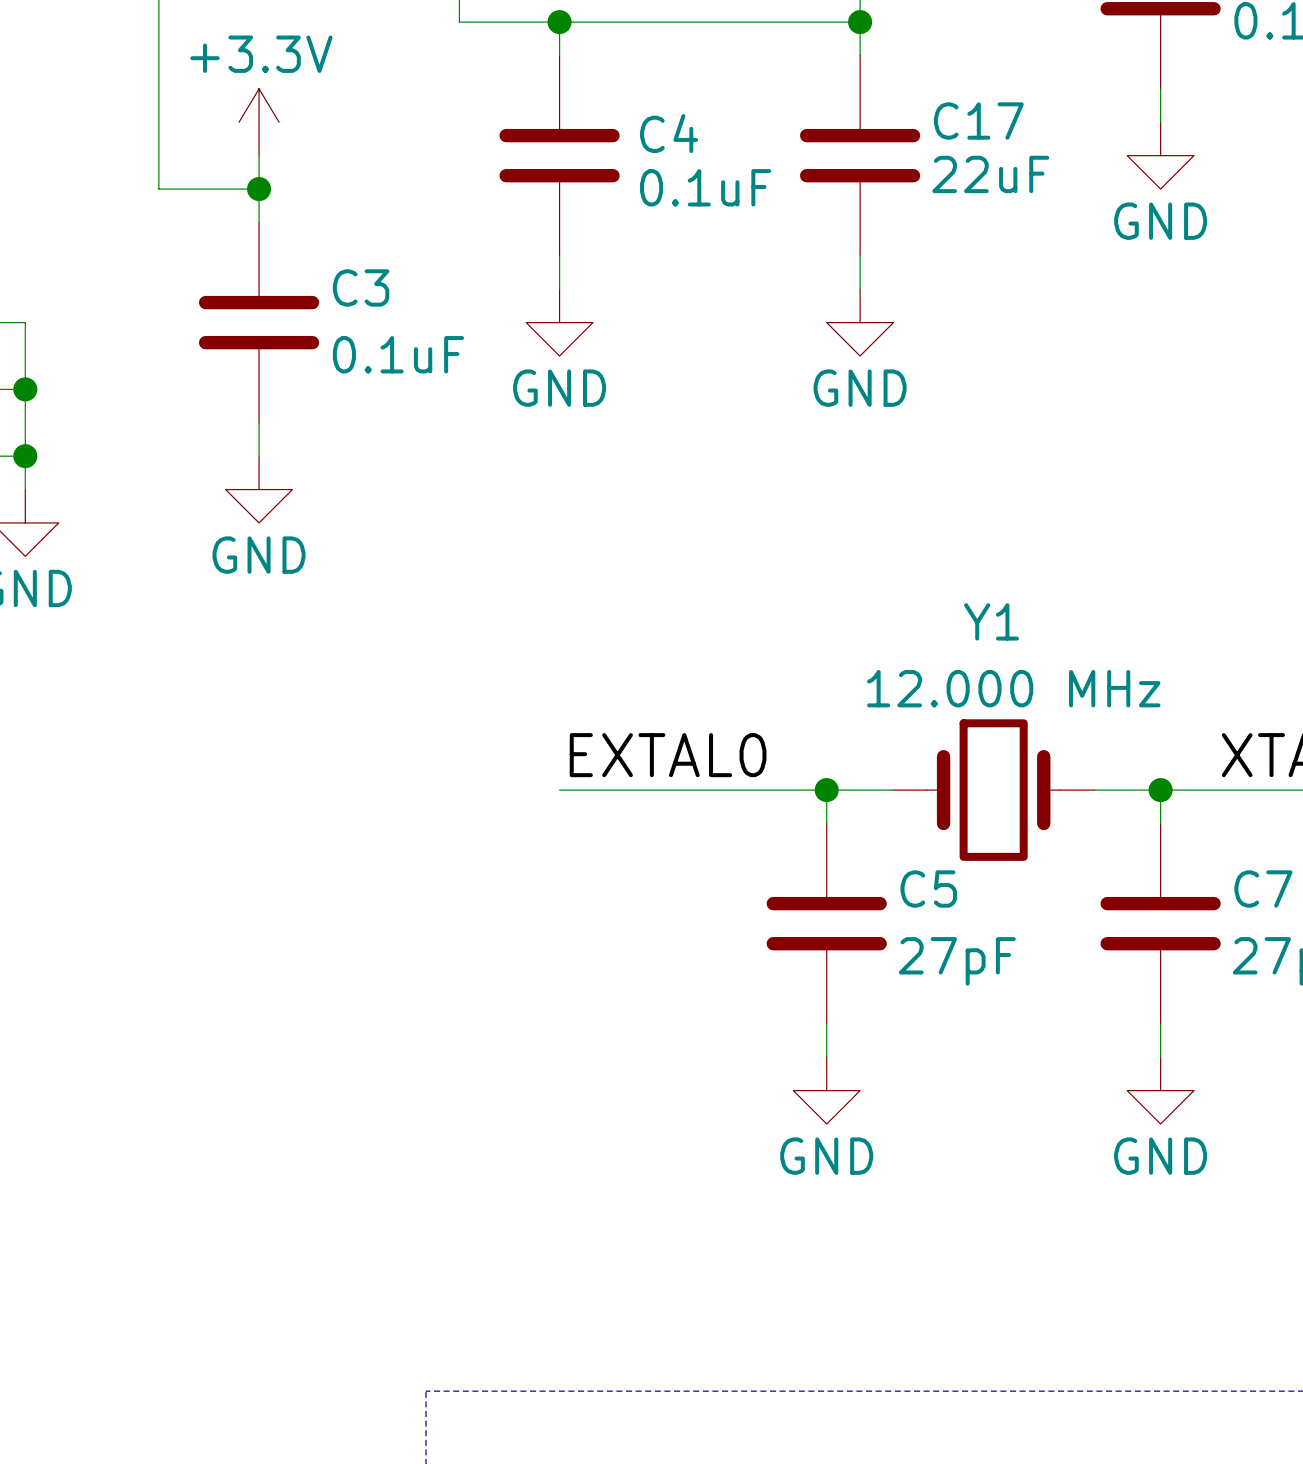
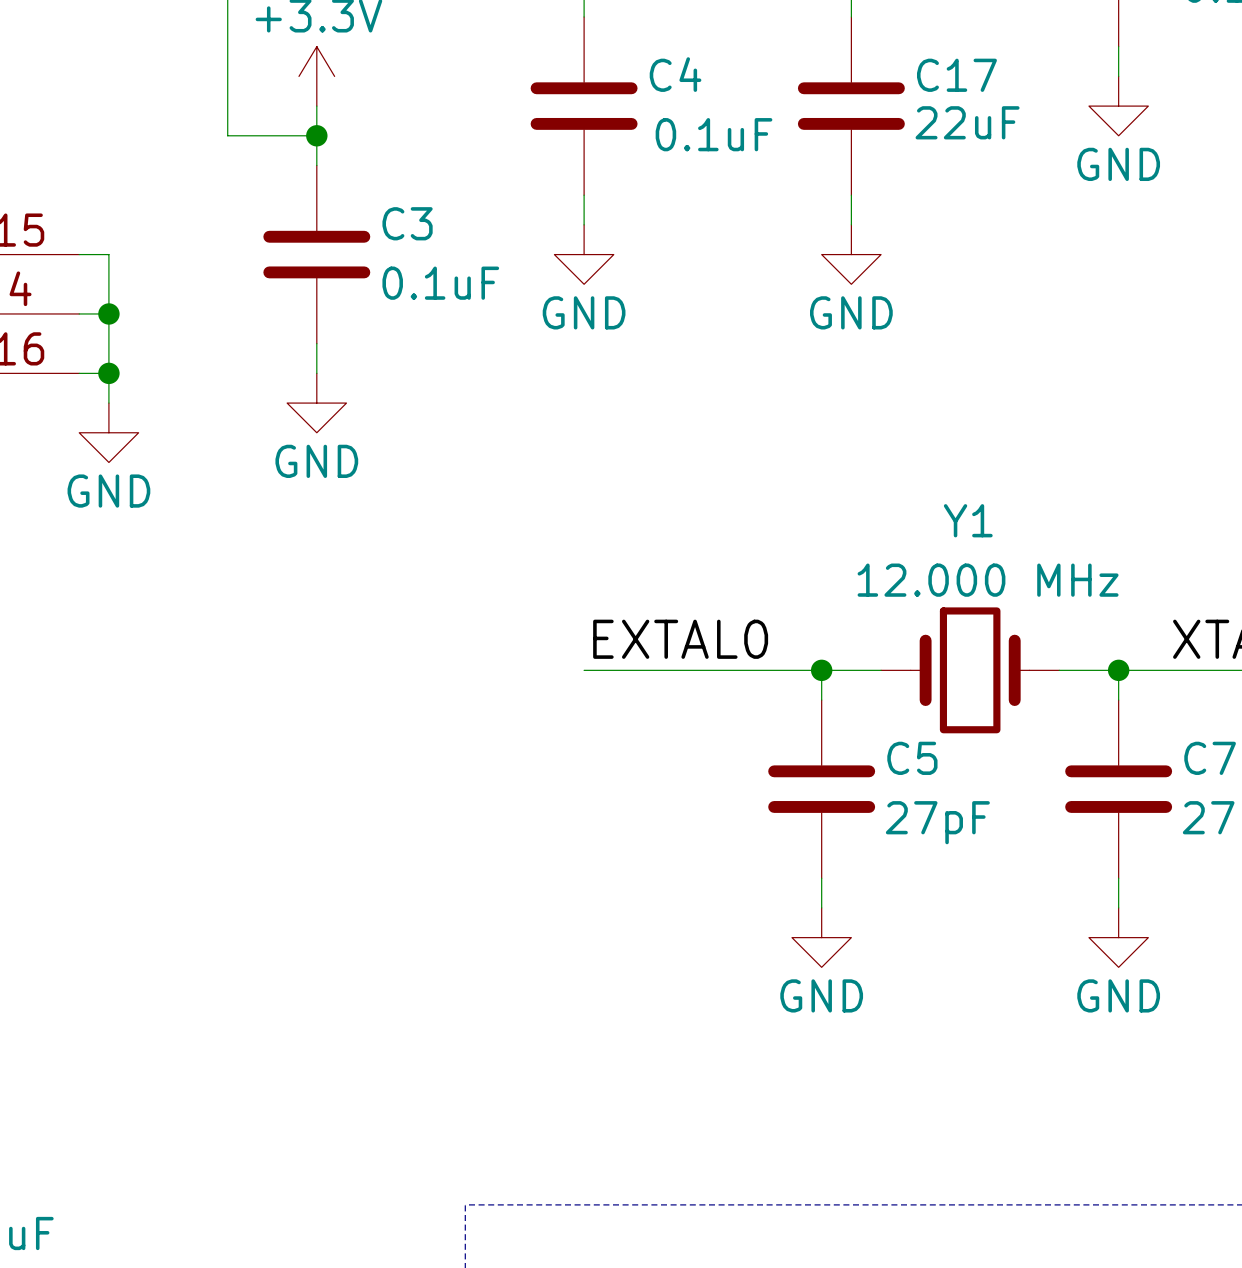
C4 name position: C4 (669, 133) -> C4 (675, 74)

